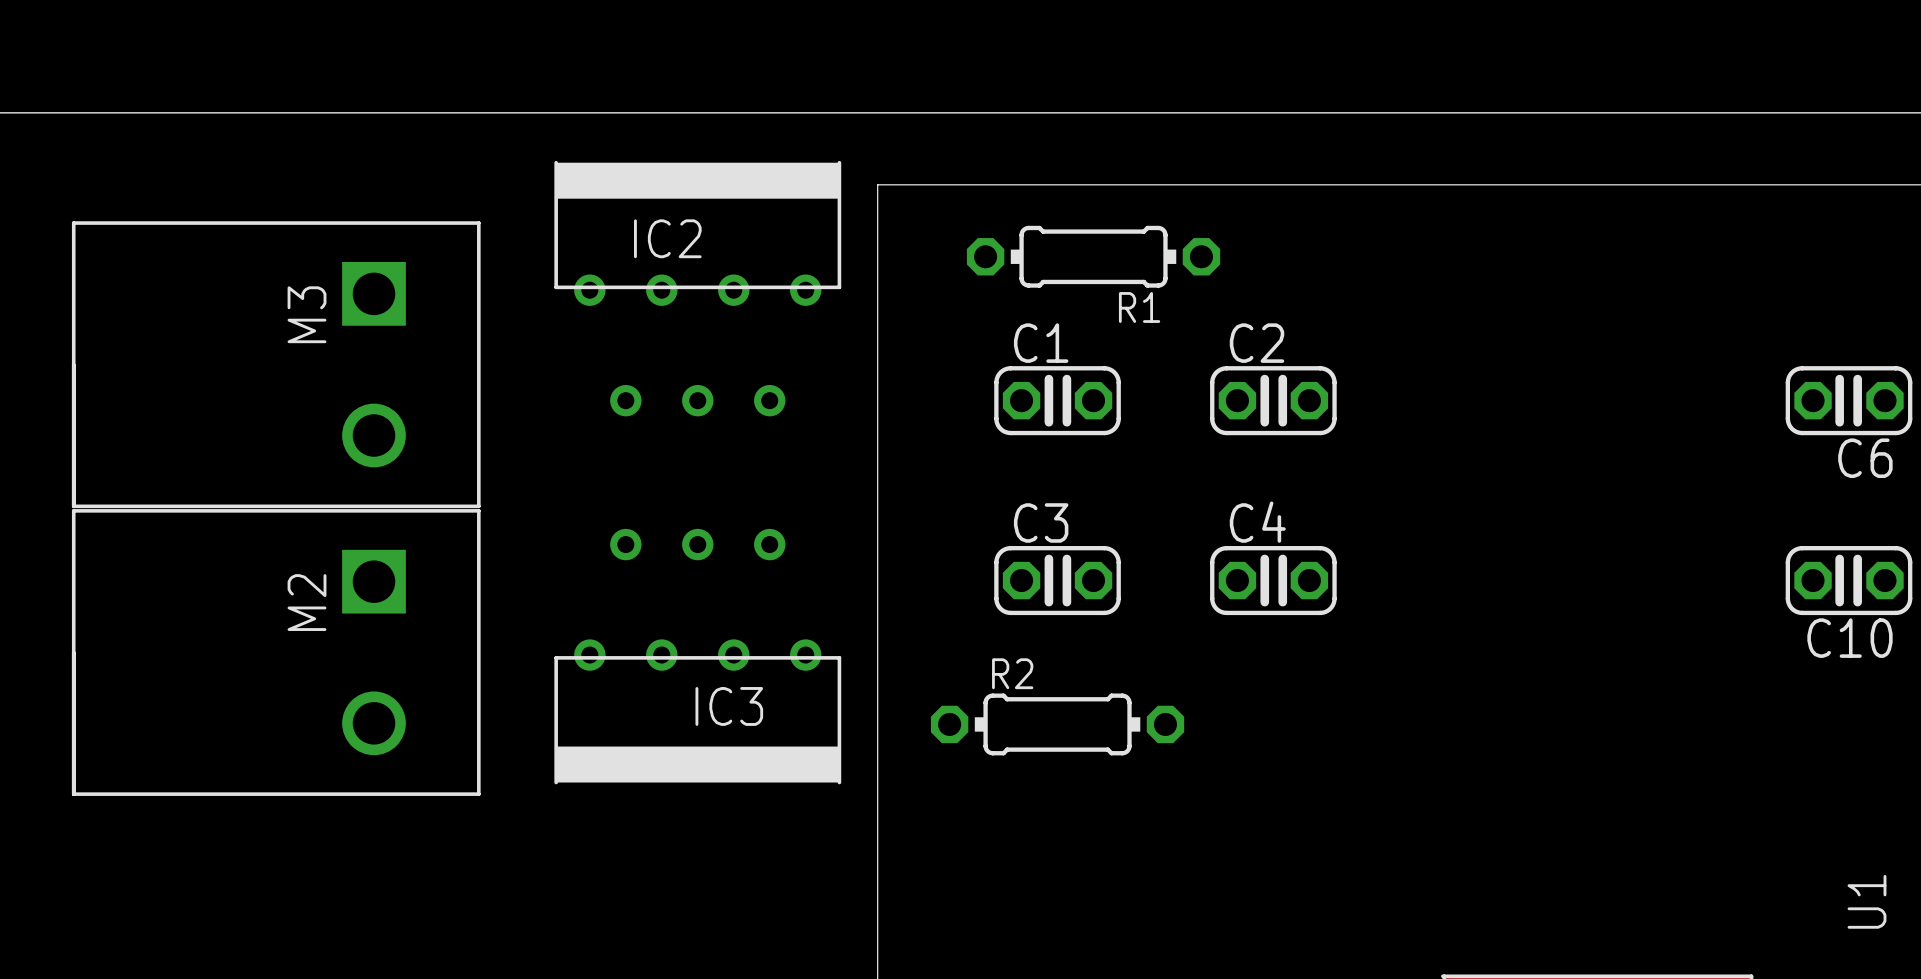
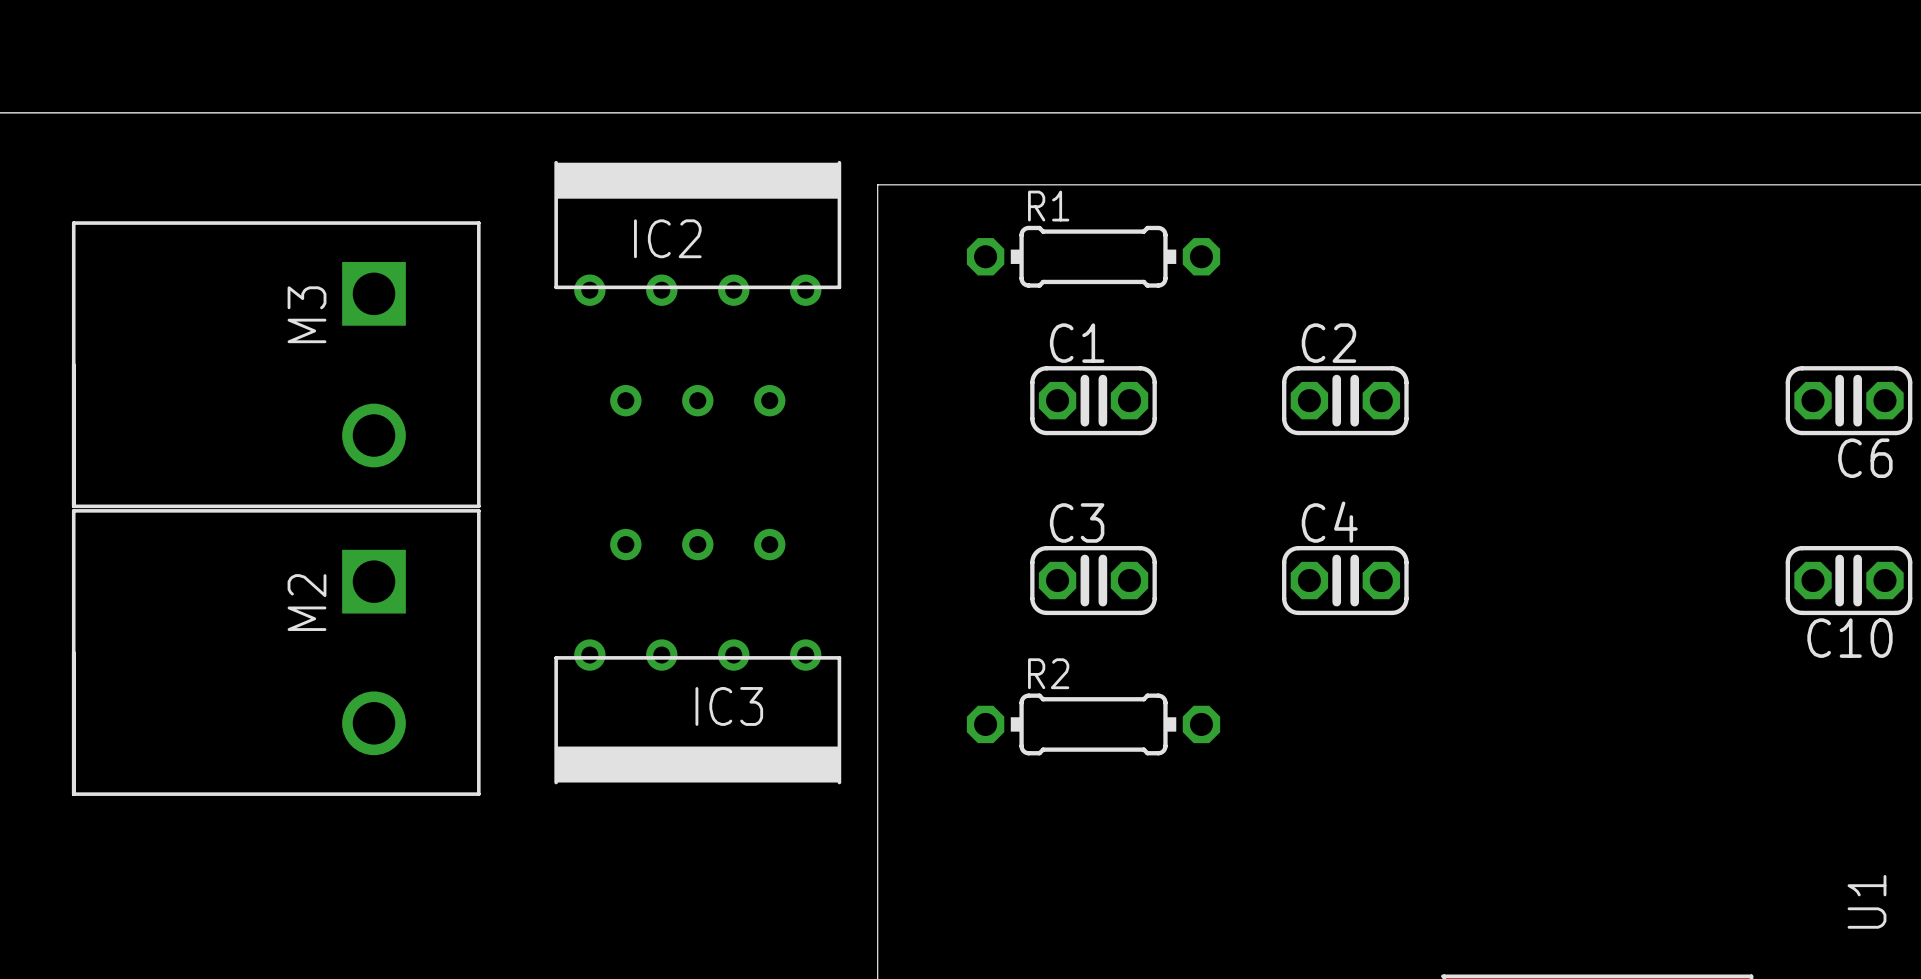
R1 name position: R1 (1139, 307) -> R1 (1048, 206)
C1 position: (1057, 400) -> (1093, 400)
C2 position: (1273, 400) -> (1345, 400)
C3 position: (1057, 580) -> (1093, 580)
C4 position: (1273, 580) -> (1345, 580)
R2 position: (1057, 724) -> (1093, 724)

